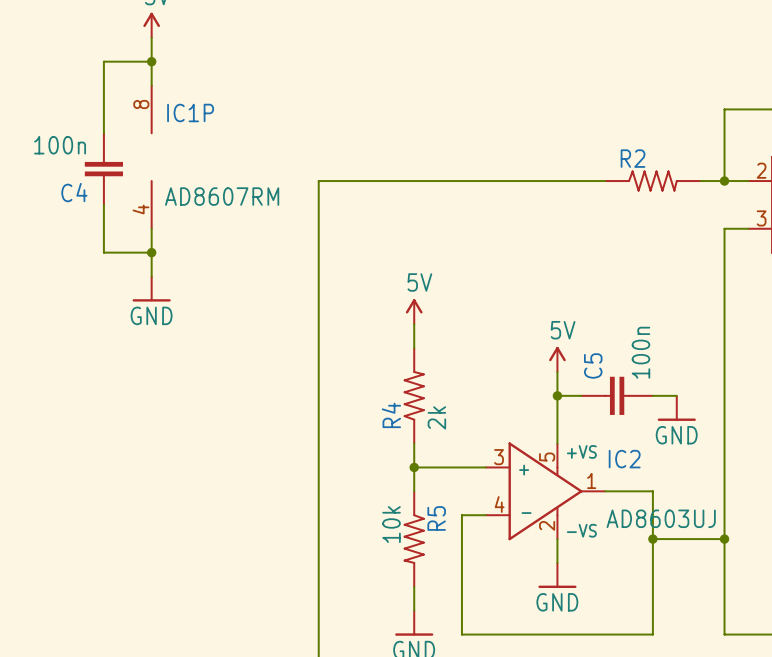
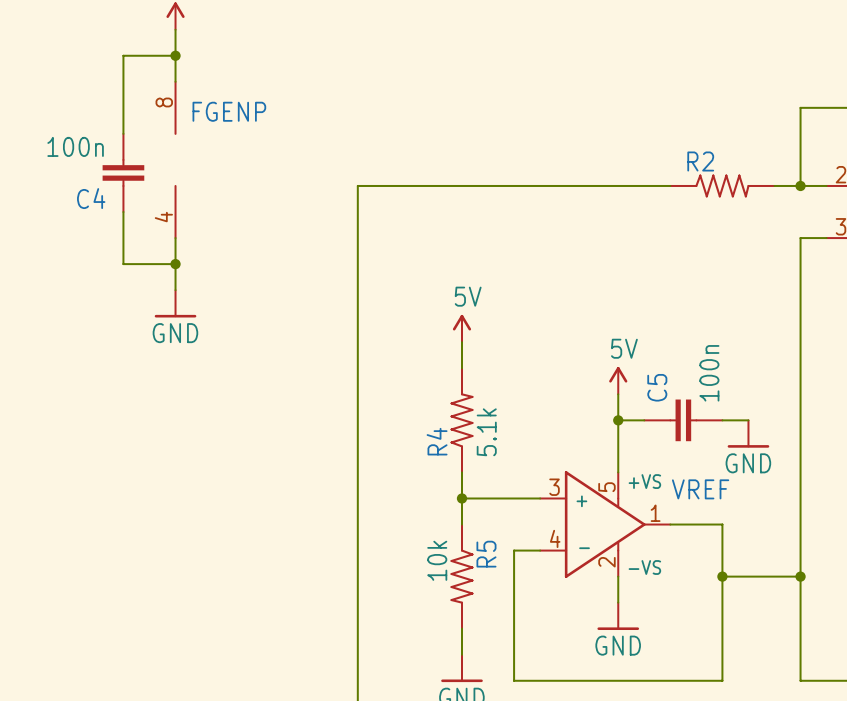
IC1P name: IC1P (190, 113) -> FGENP (229, 111)
IC1P value: AD8607RM (222, 196) -> none
R4 value: 2k (436, 417) -> 5.1k (486, 432)
IC2 name: IC2 (624, 459) -> VREF (700, 489)
IC2 value: AD8603UJ (661, 518) -> none

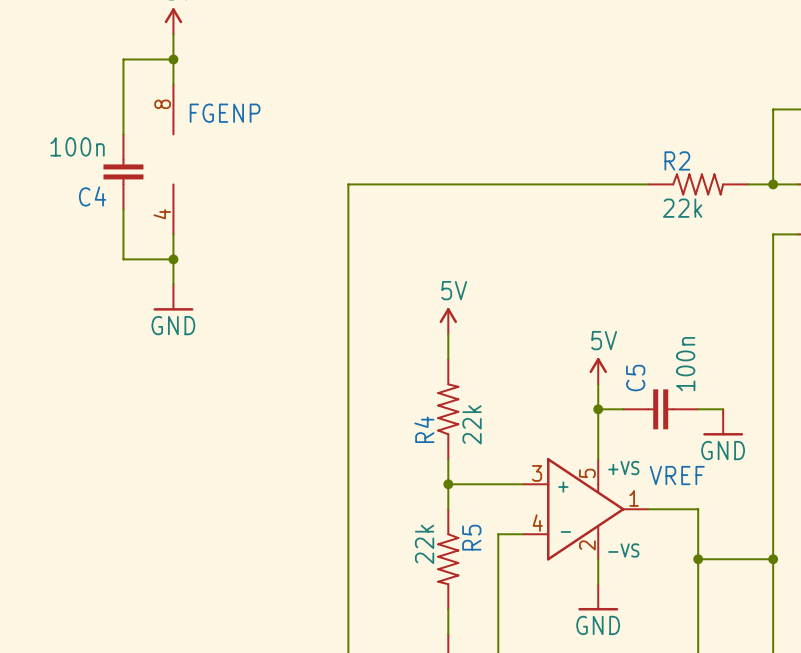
R2 value: none -> 22k (682, 208)
R4 value: 5.1k (486, 432) -> 22k (472, 424)
R5 value: 10k (437, 560) -> 22k (424, 544)

